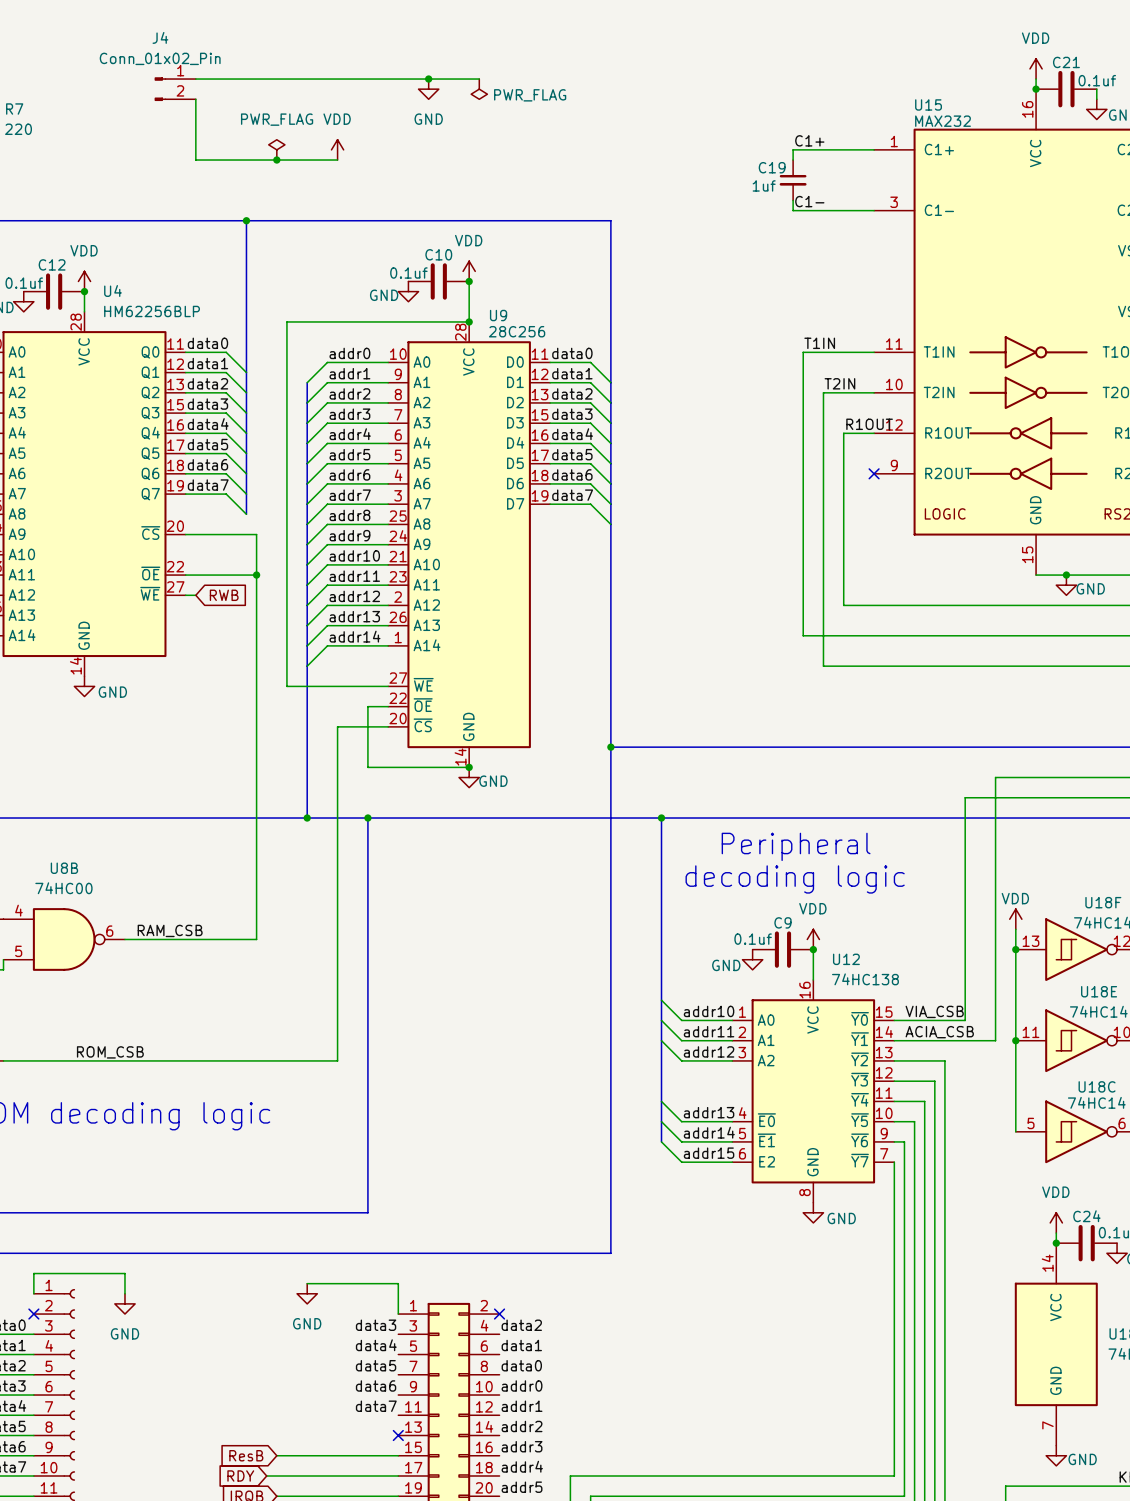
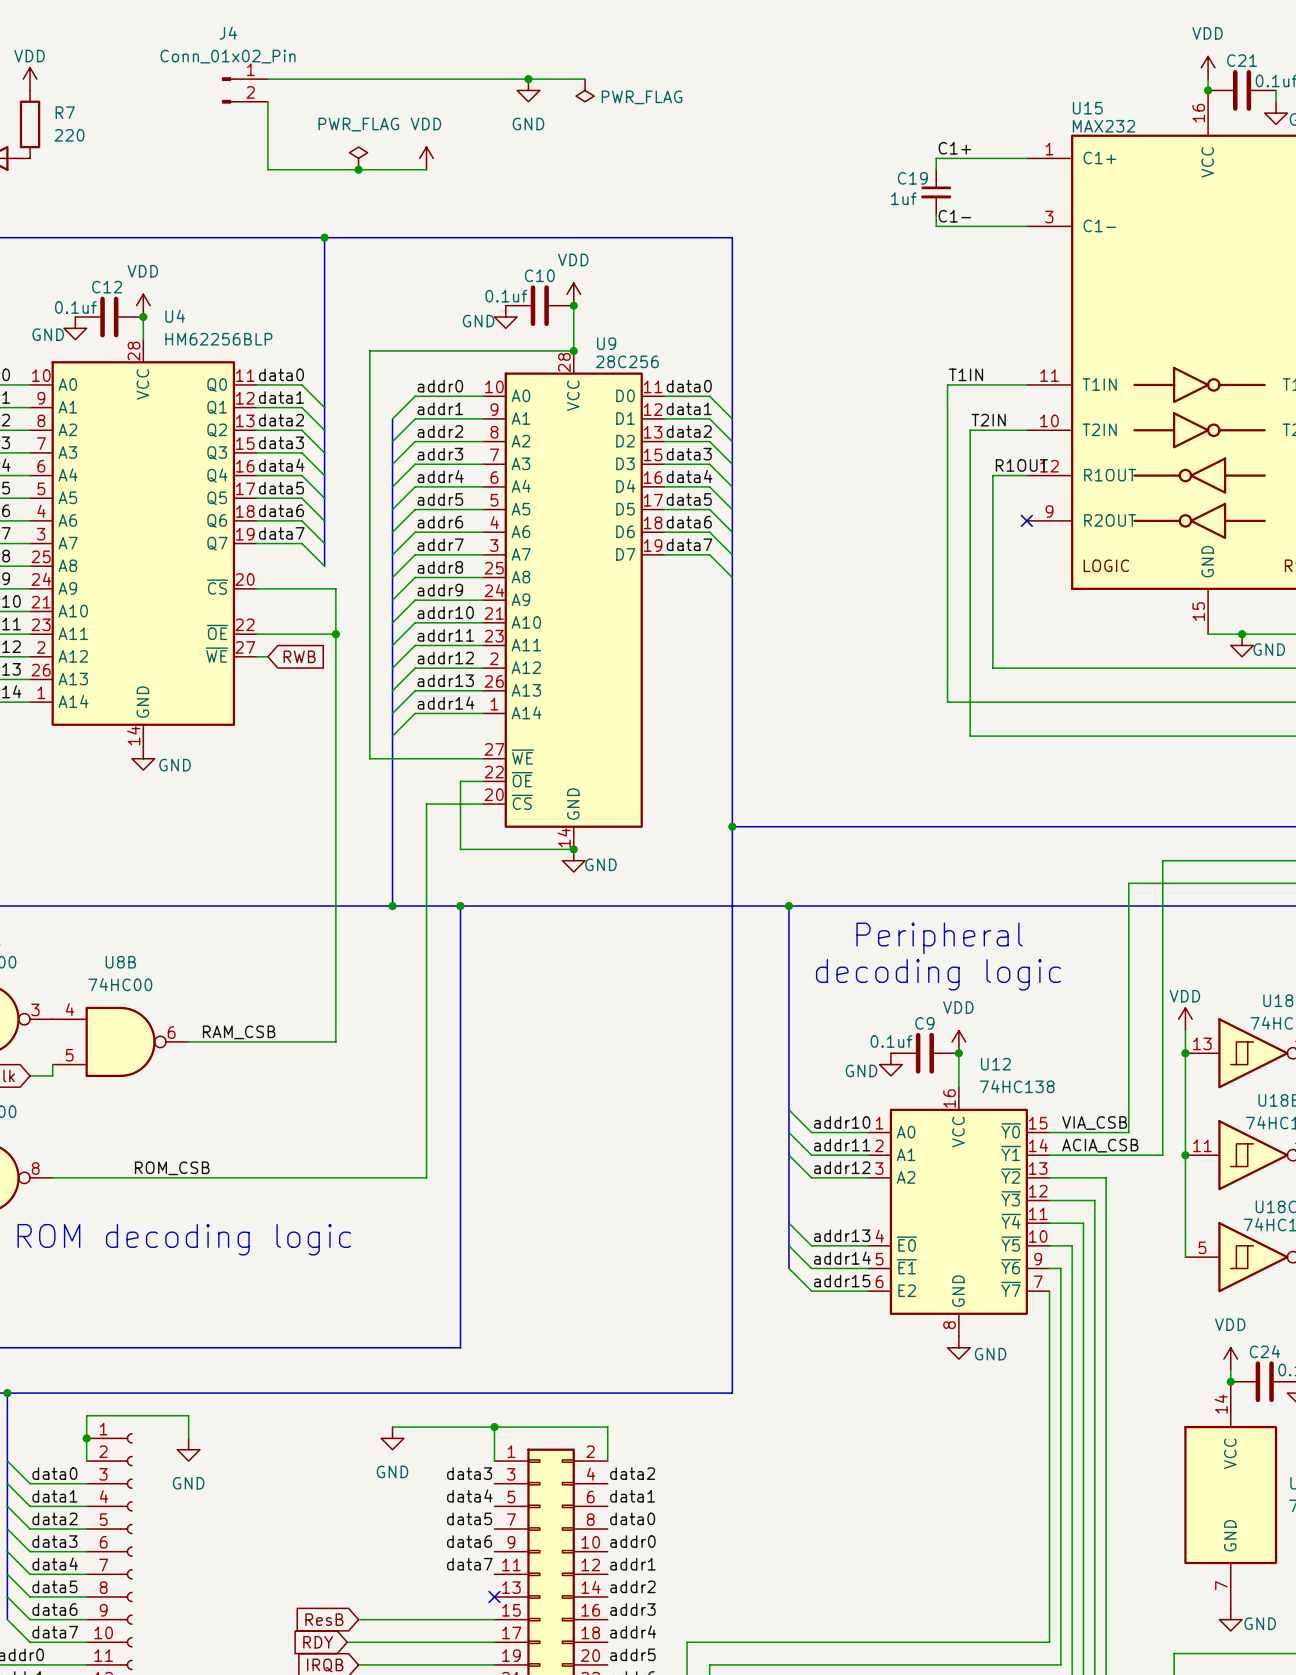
wire: none -> (494, 1427) (607, 1427) (607, 1461)
junction: none -> (494, 1427)
wire: none -> (86, 1438) (86, 1461)
junction: none -> (86, 1438)
no-connect mark: (33, 1314) -> none
no-connect mark: (499, 1314) -> none

